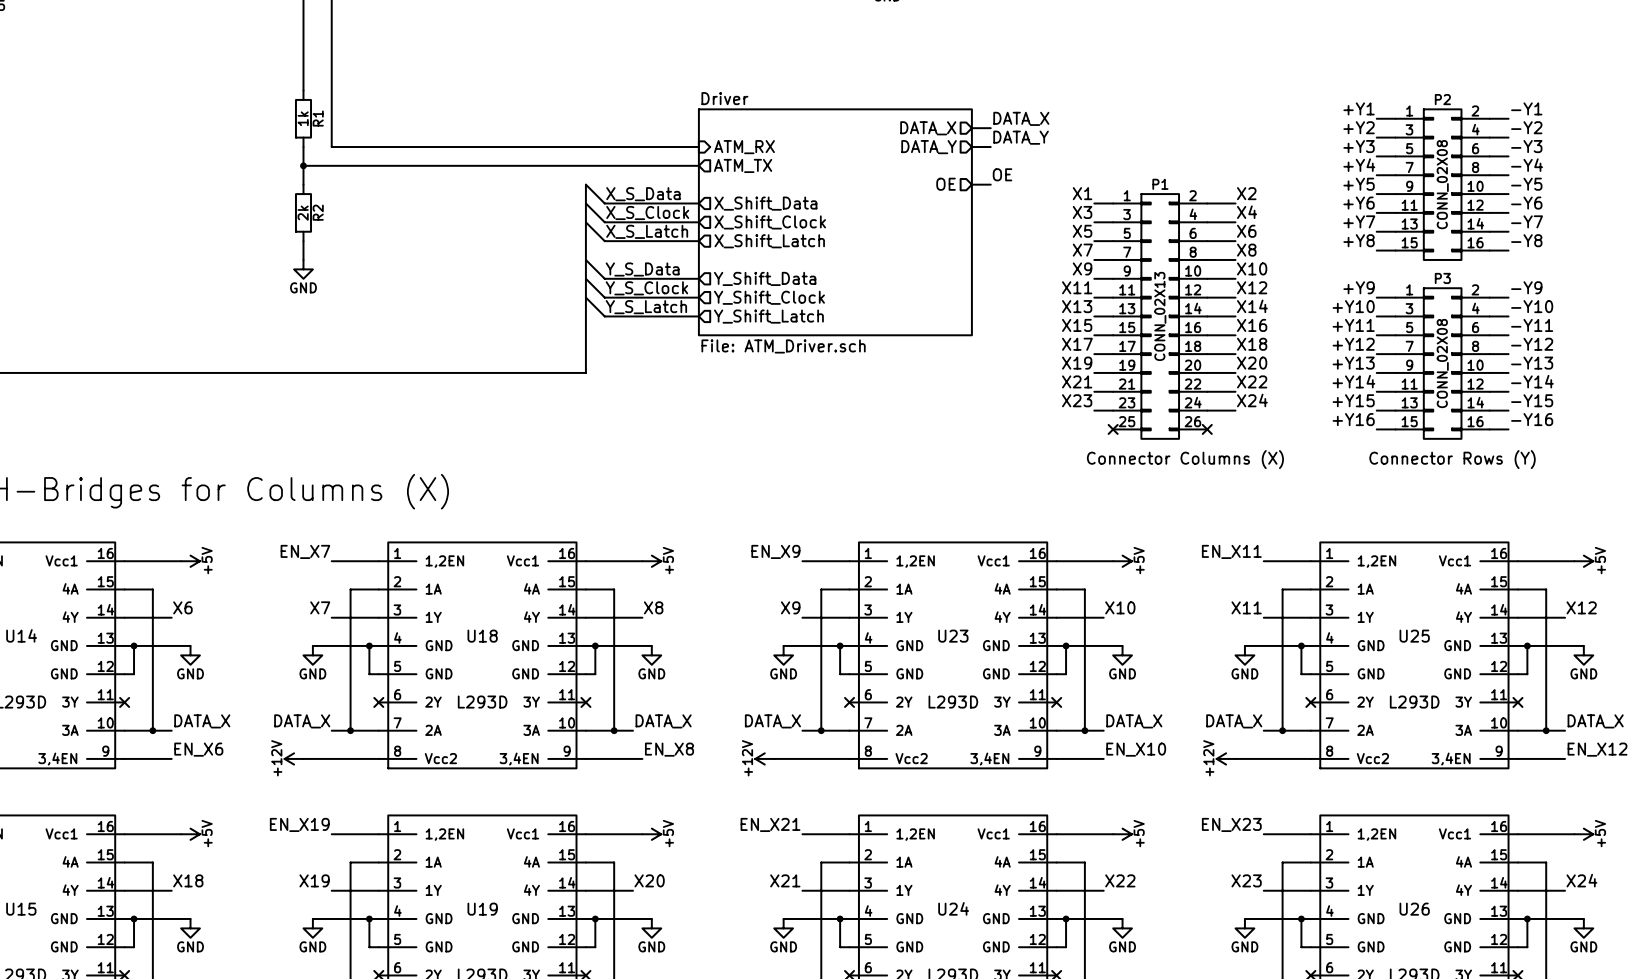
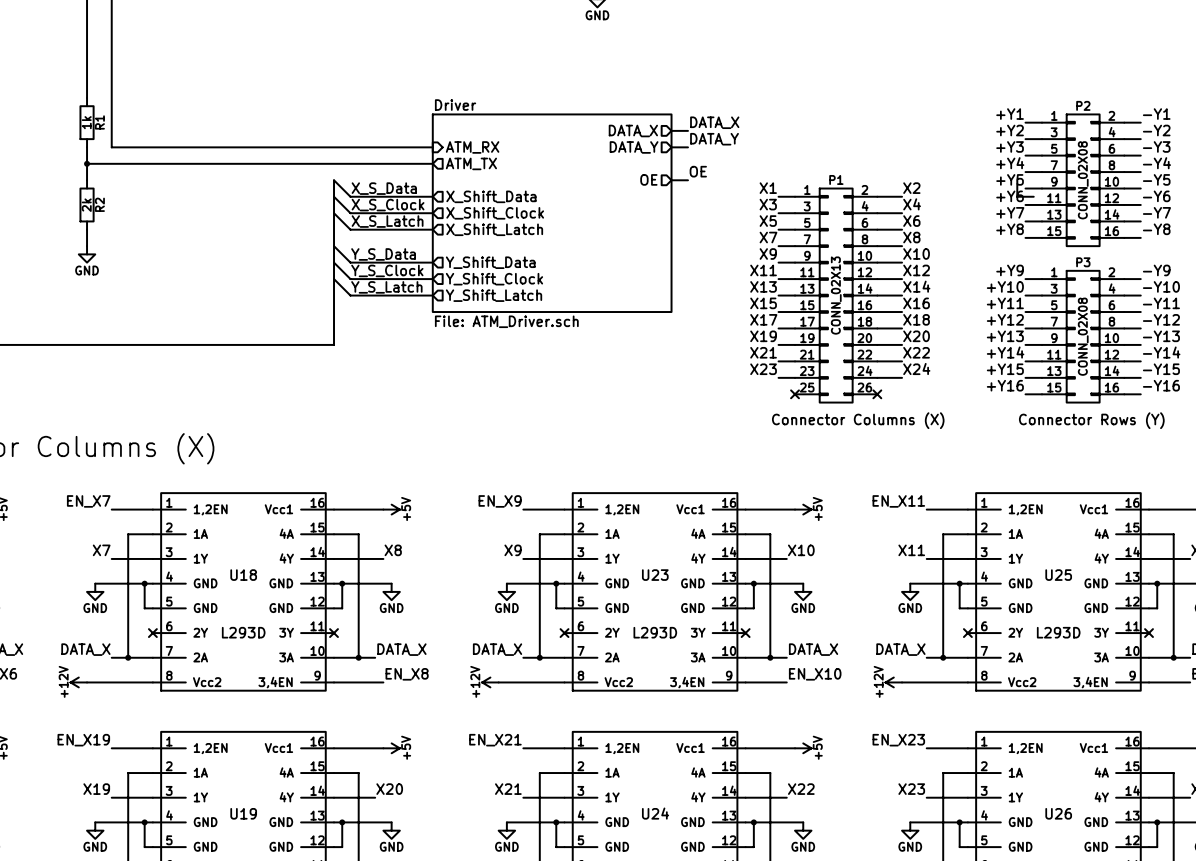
wire: none -> (1017, 180) (1017, 196) (1033, 196)

